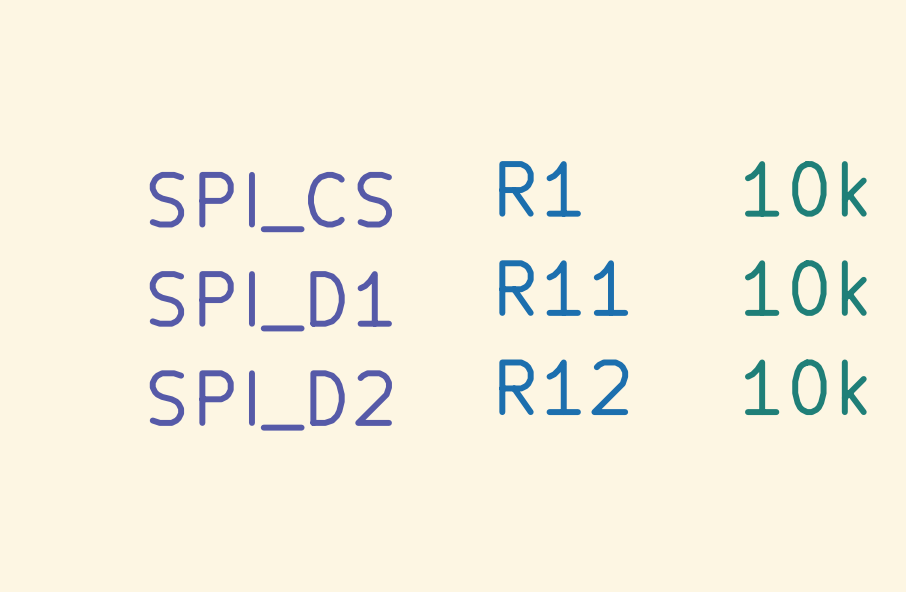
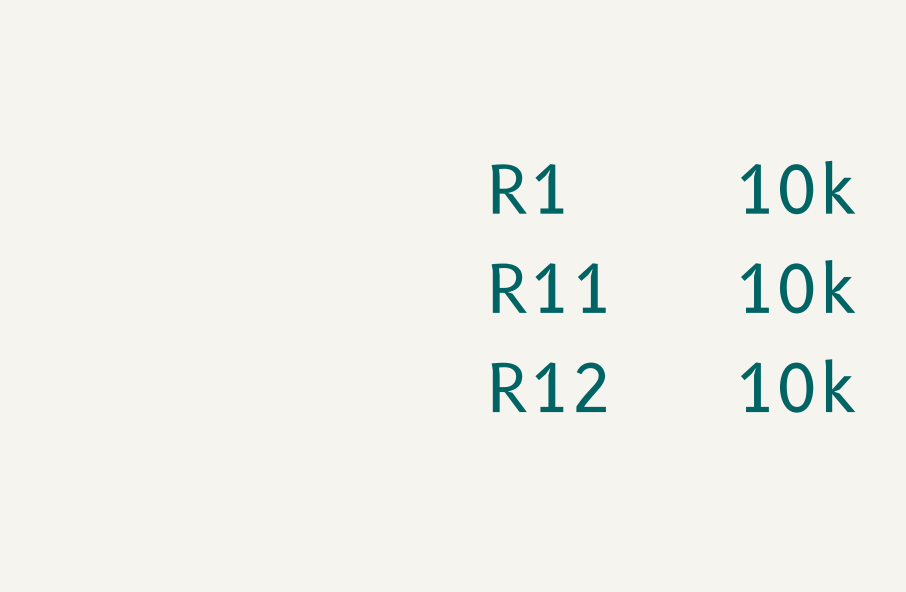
text: SPI_CS (270, 202) -> none
text: SPI_D1 (270, 301) -> none
text: SPI_D2 (270, 400) -> none

